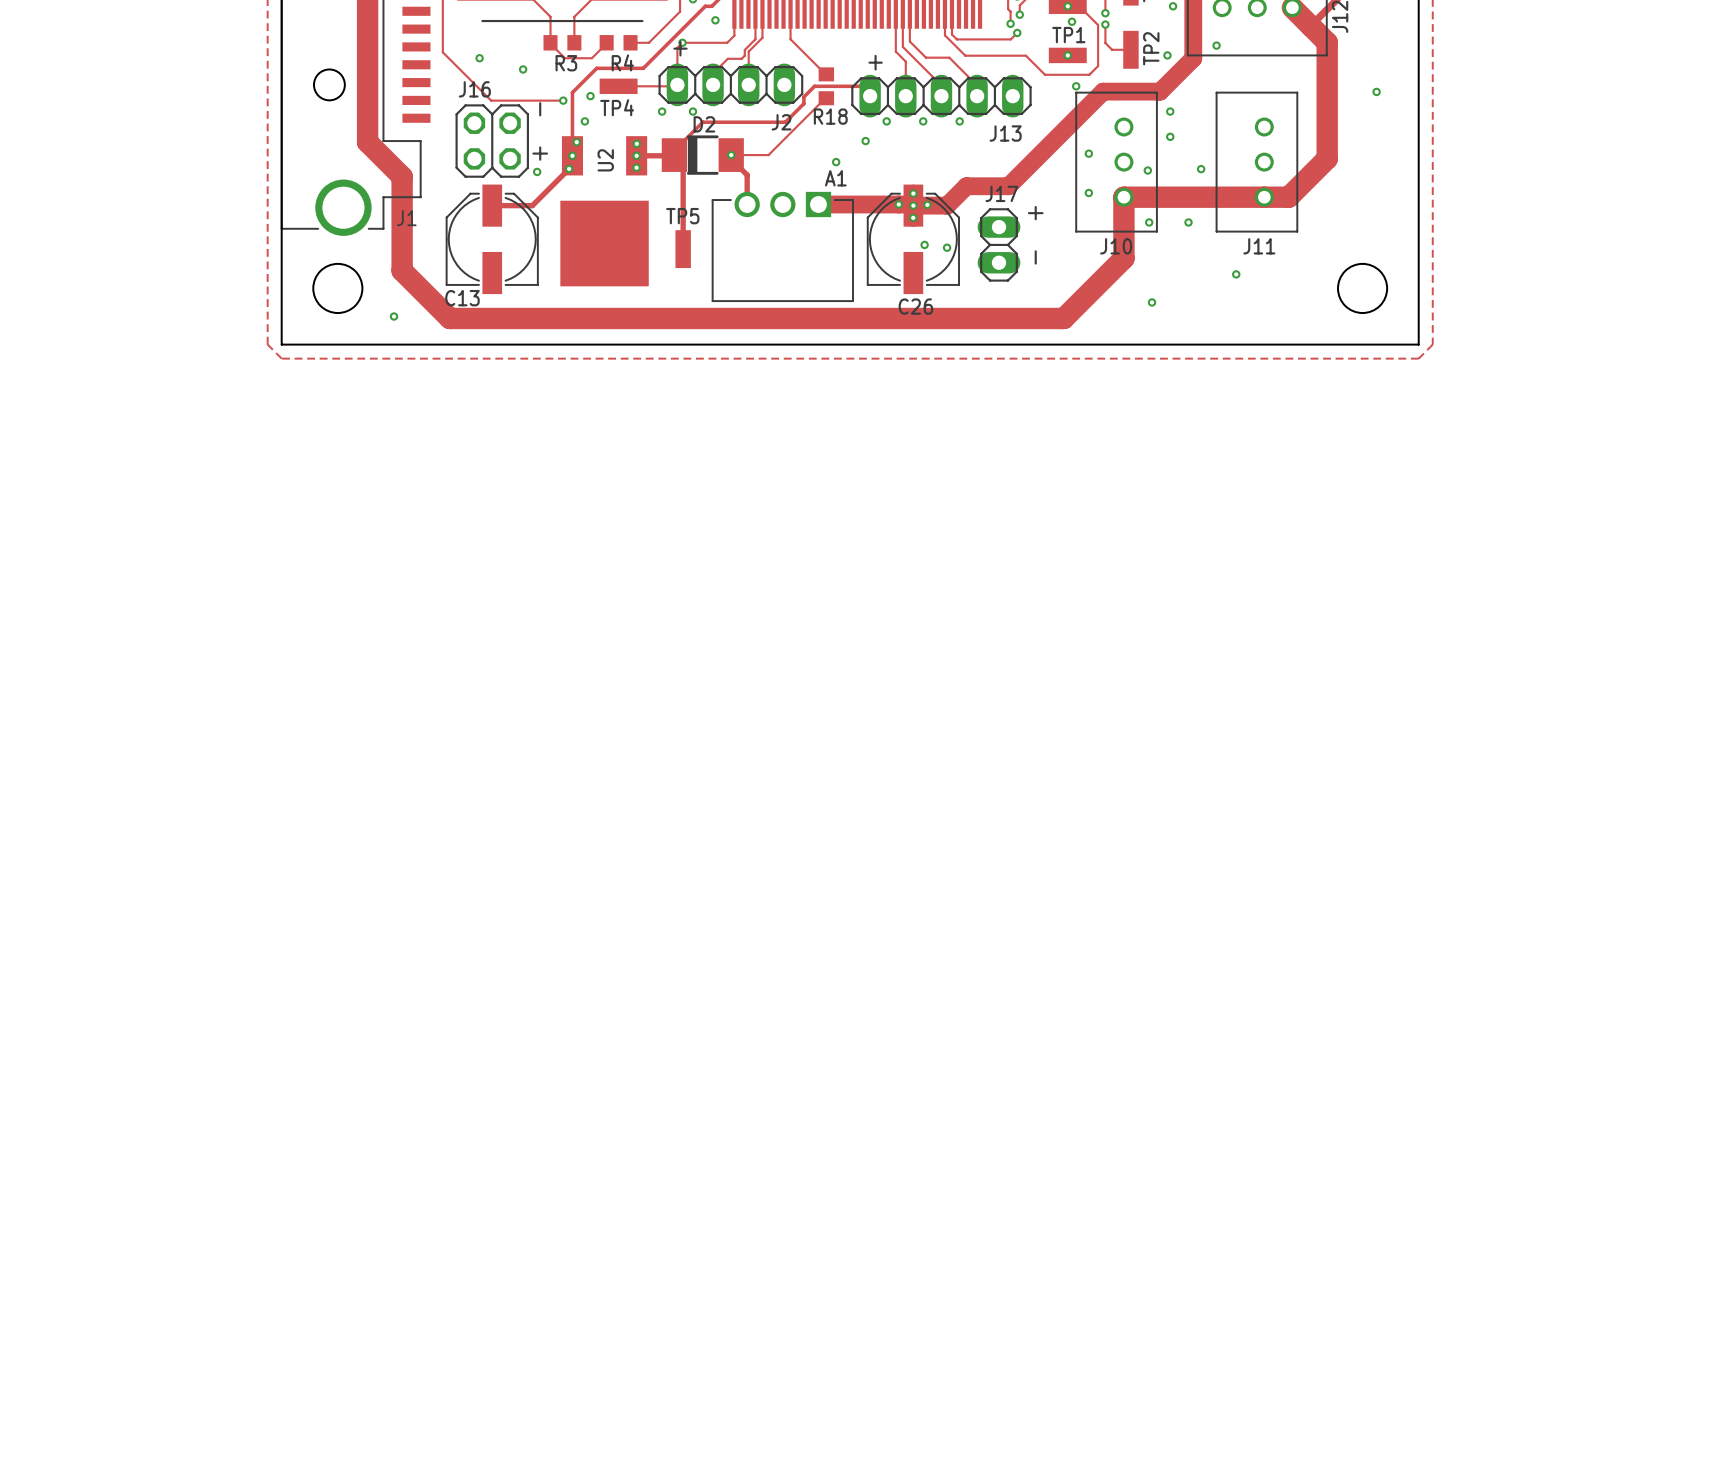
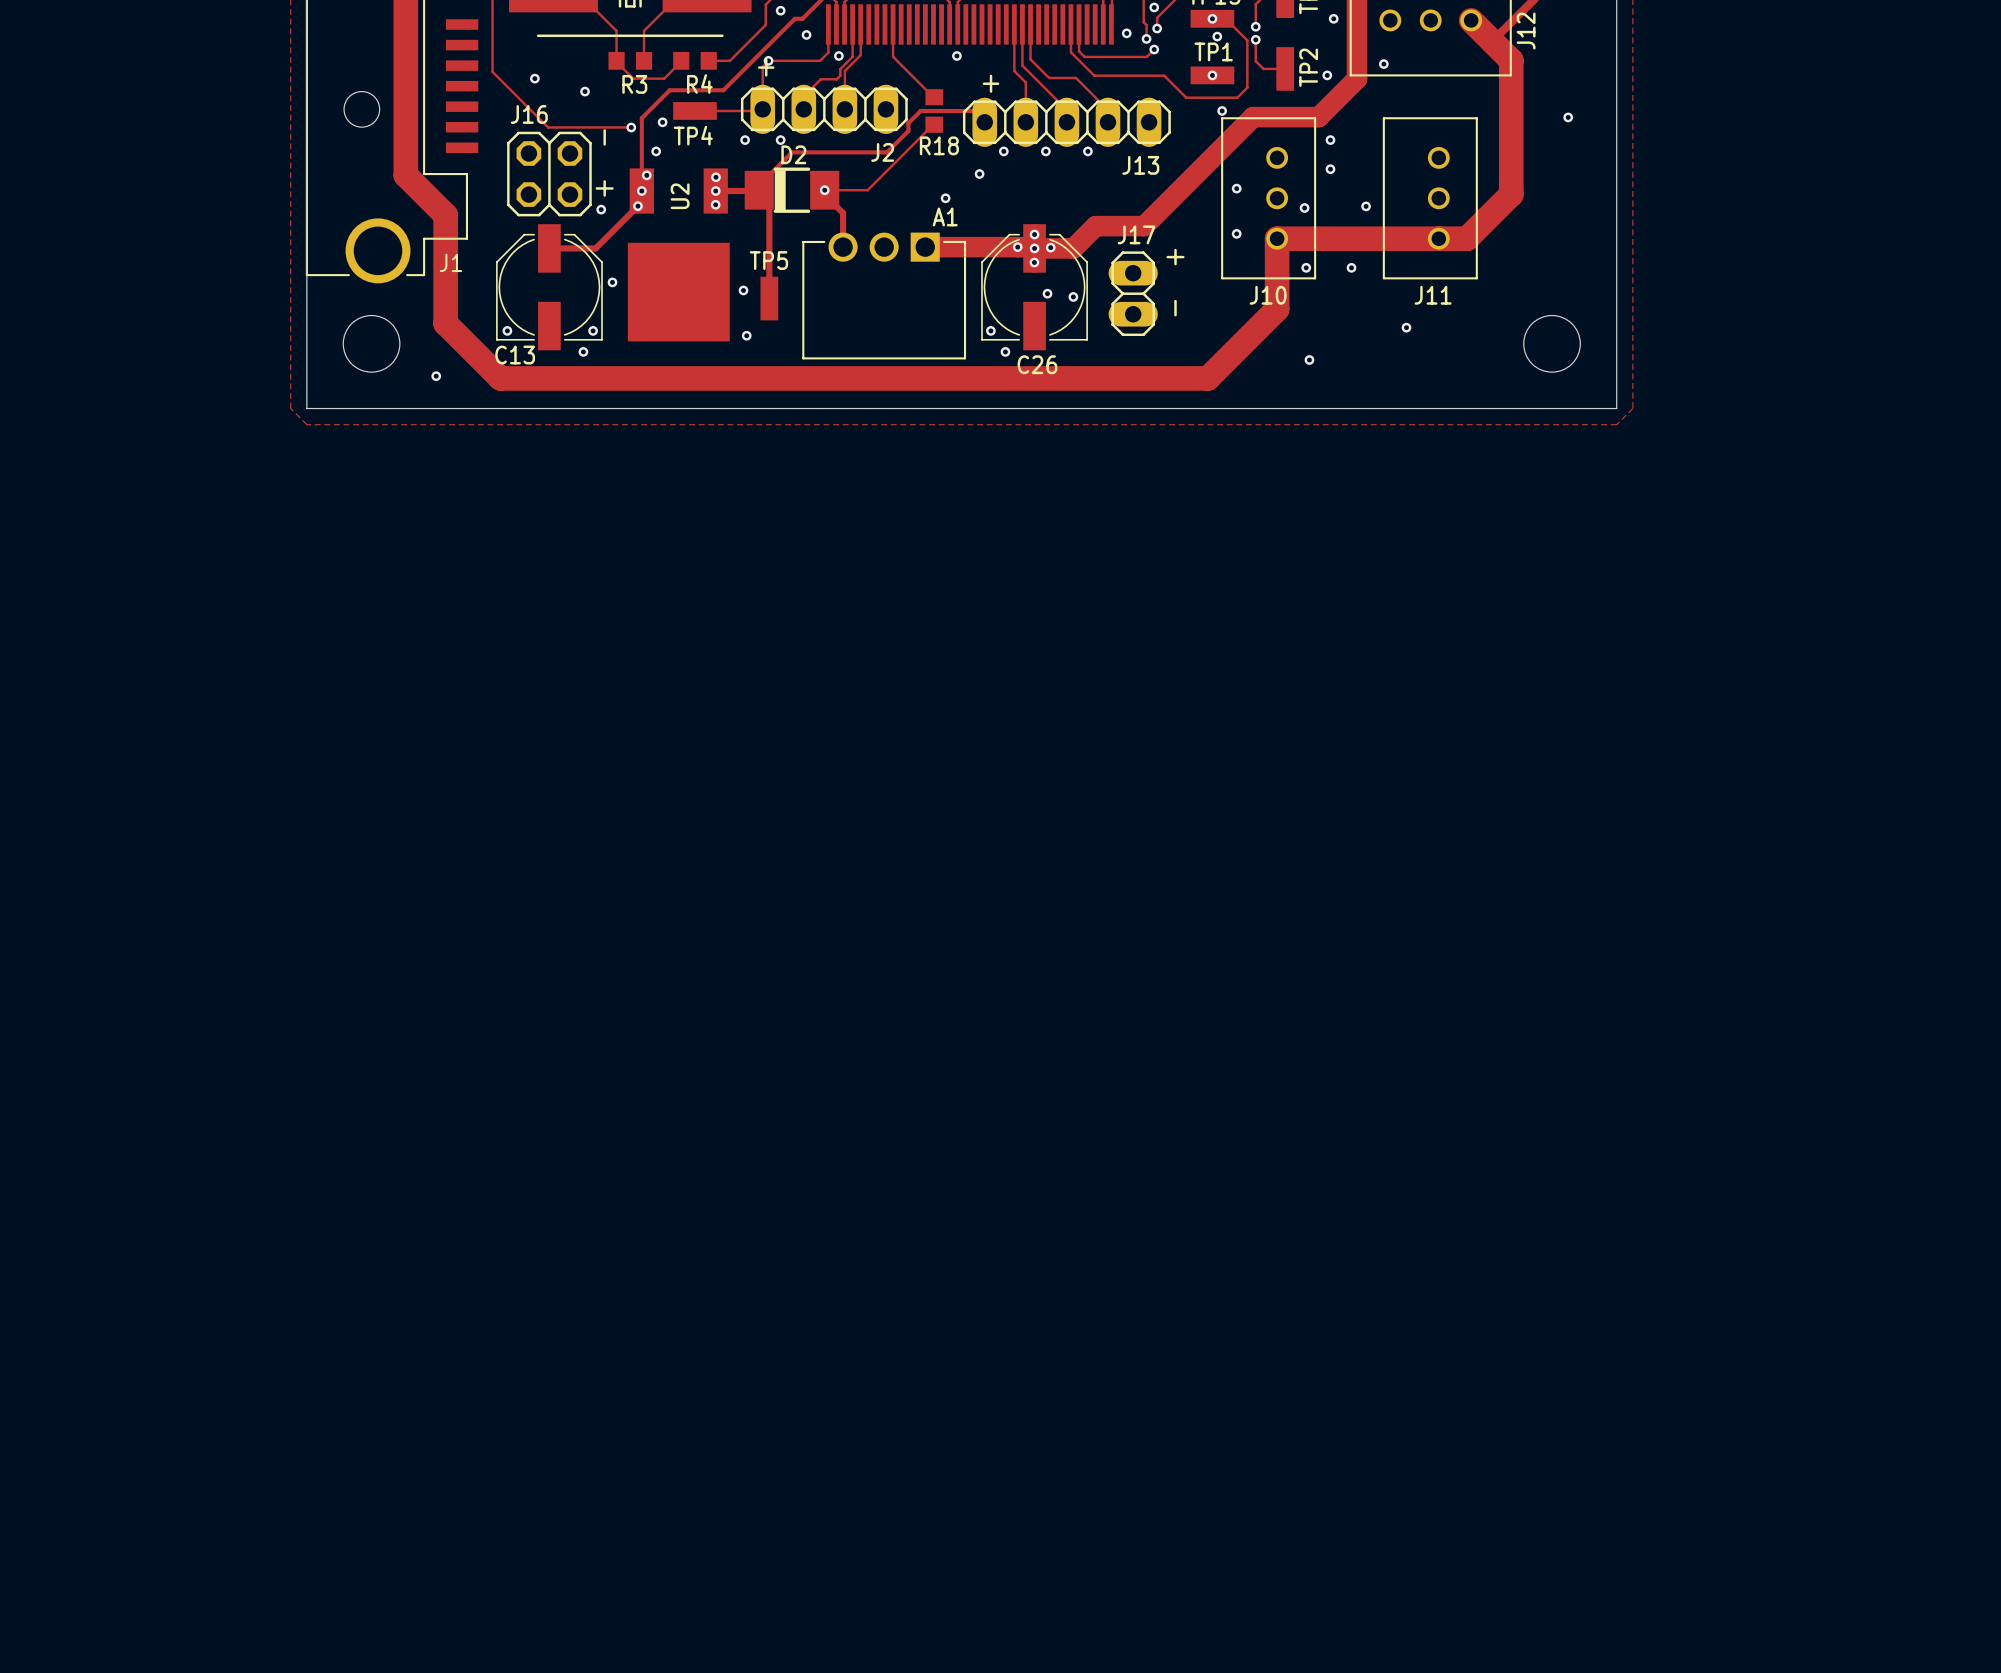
via: none -> (1126, 33)
via: none -> (838, 55)
via: none -> (956, 55)
via: none -> (612, 282)
via: none -> (743, 290)
via: none -> (507, 330)
via: none -> (593, 330)
via: none -> (990, 330)
via: none -> (746, 335)
via: none -> (583, 351)
via: none -> (1005, 351)

